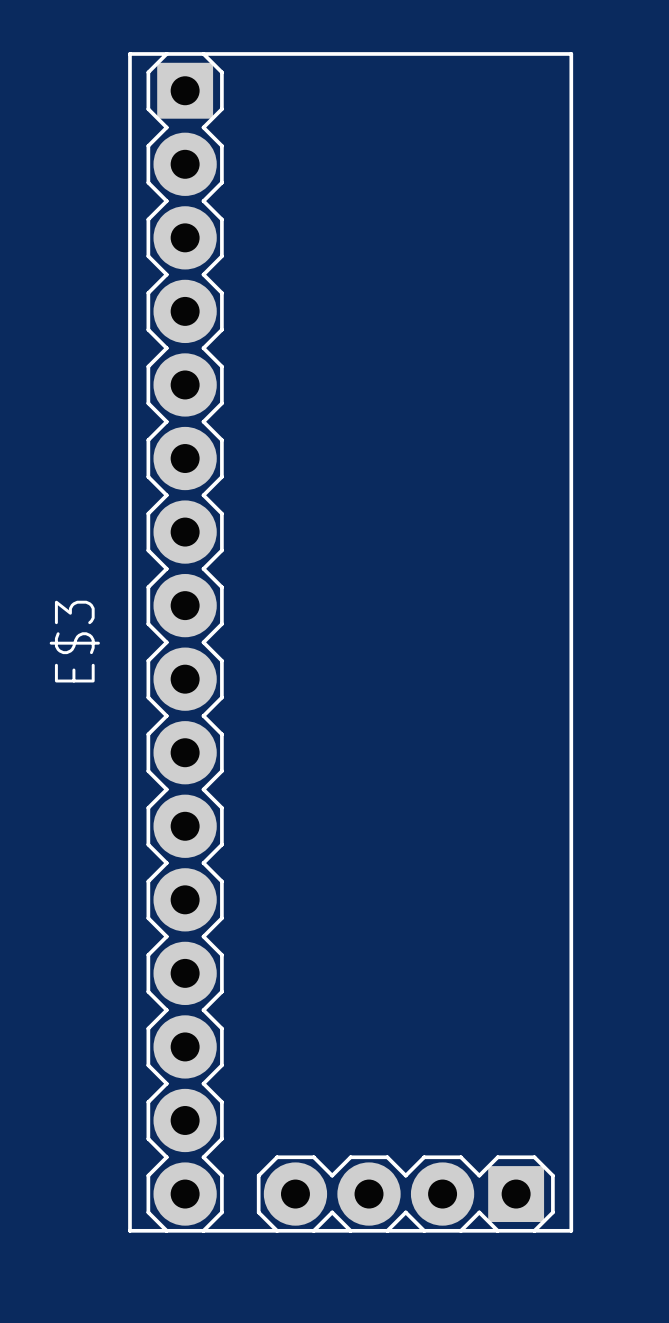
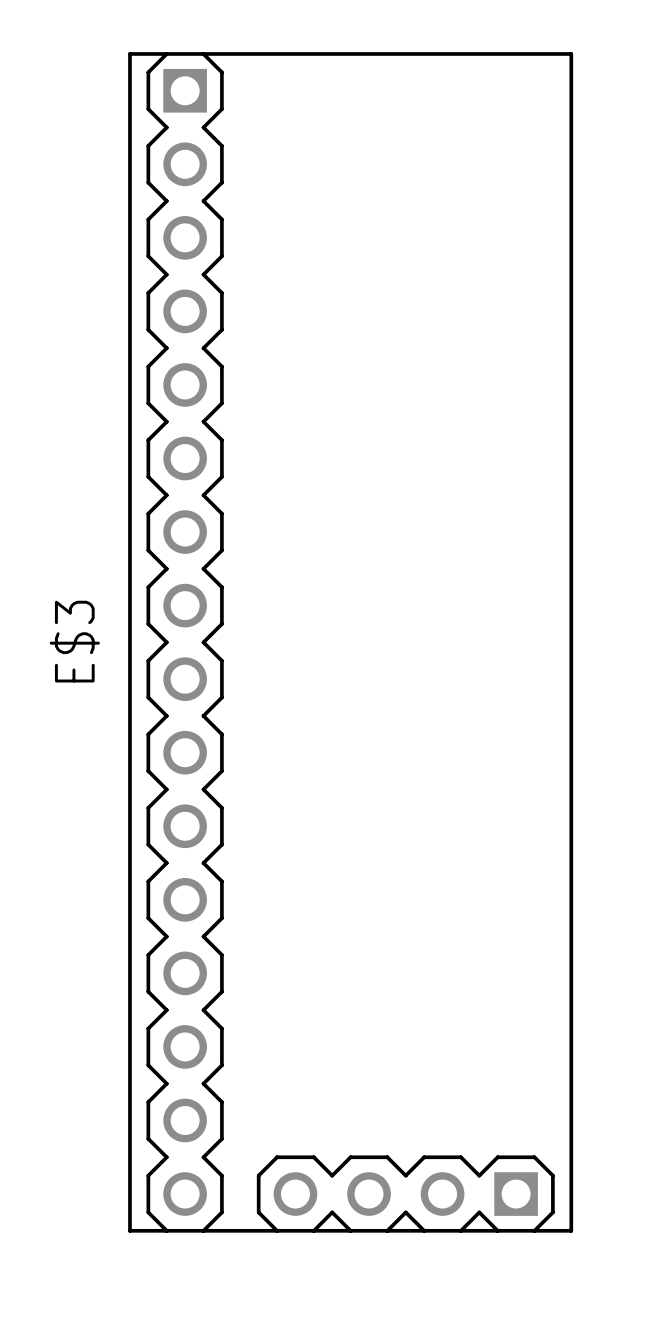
E$3 footprint: [128, 52, 574, 1233] -> [128, 52, 574, 1233]

